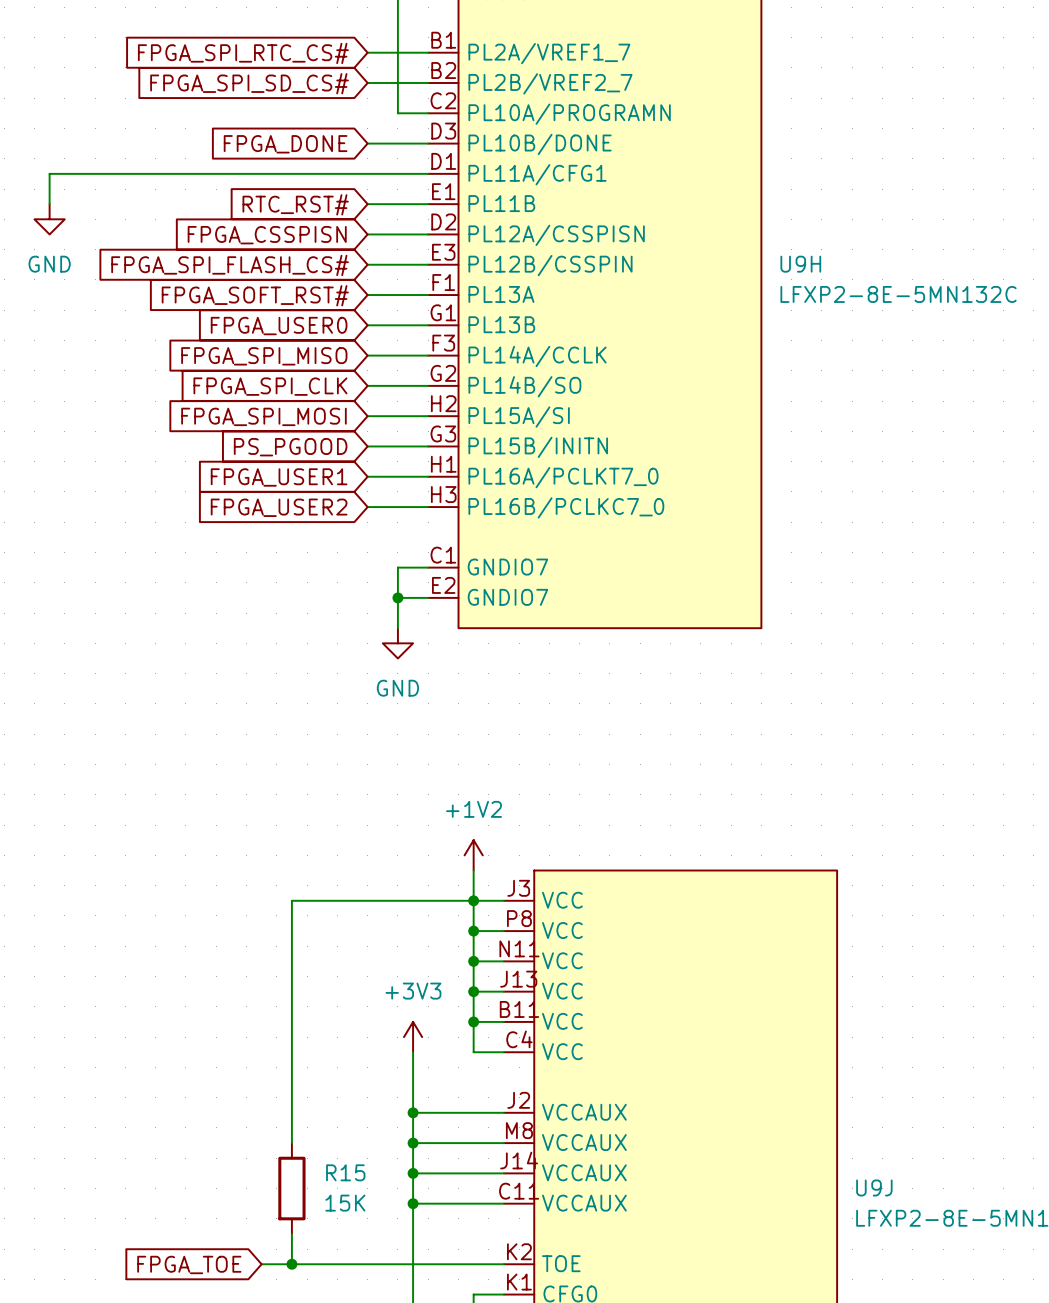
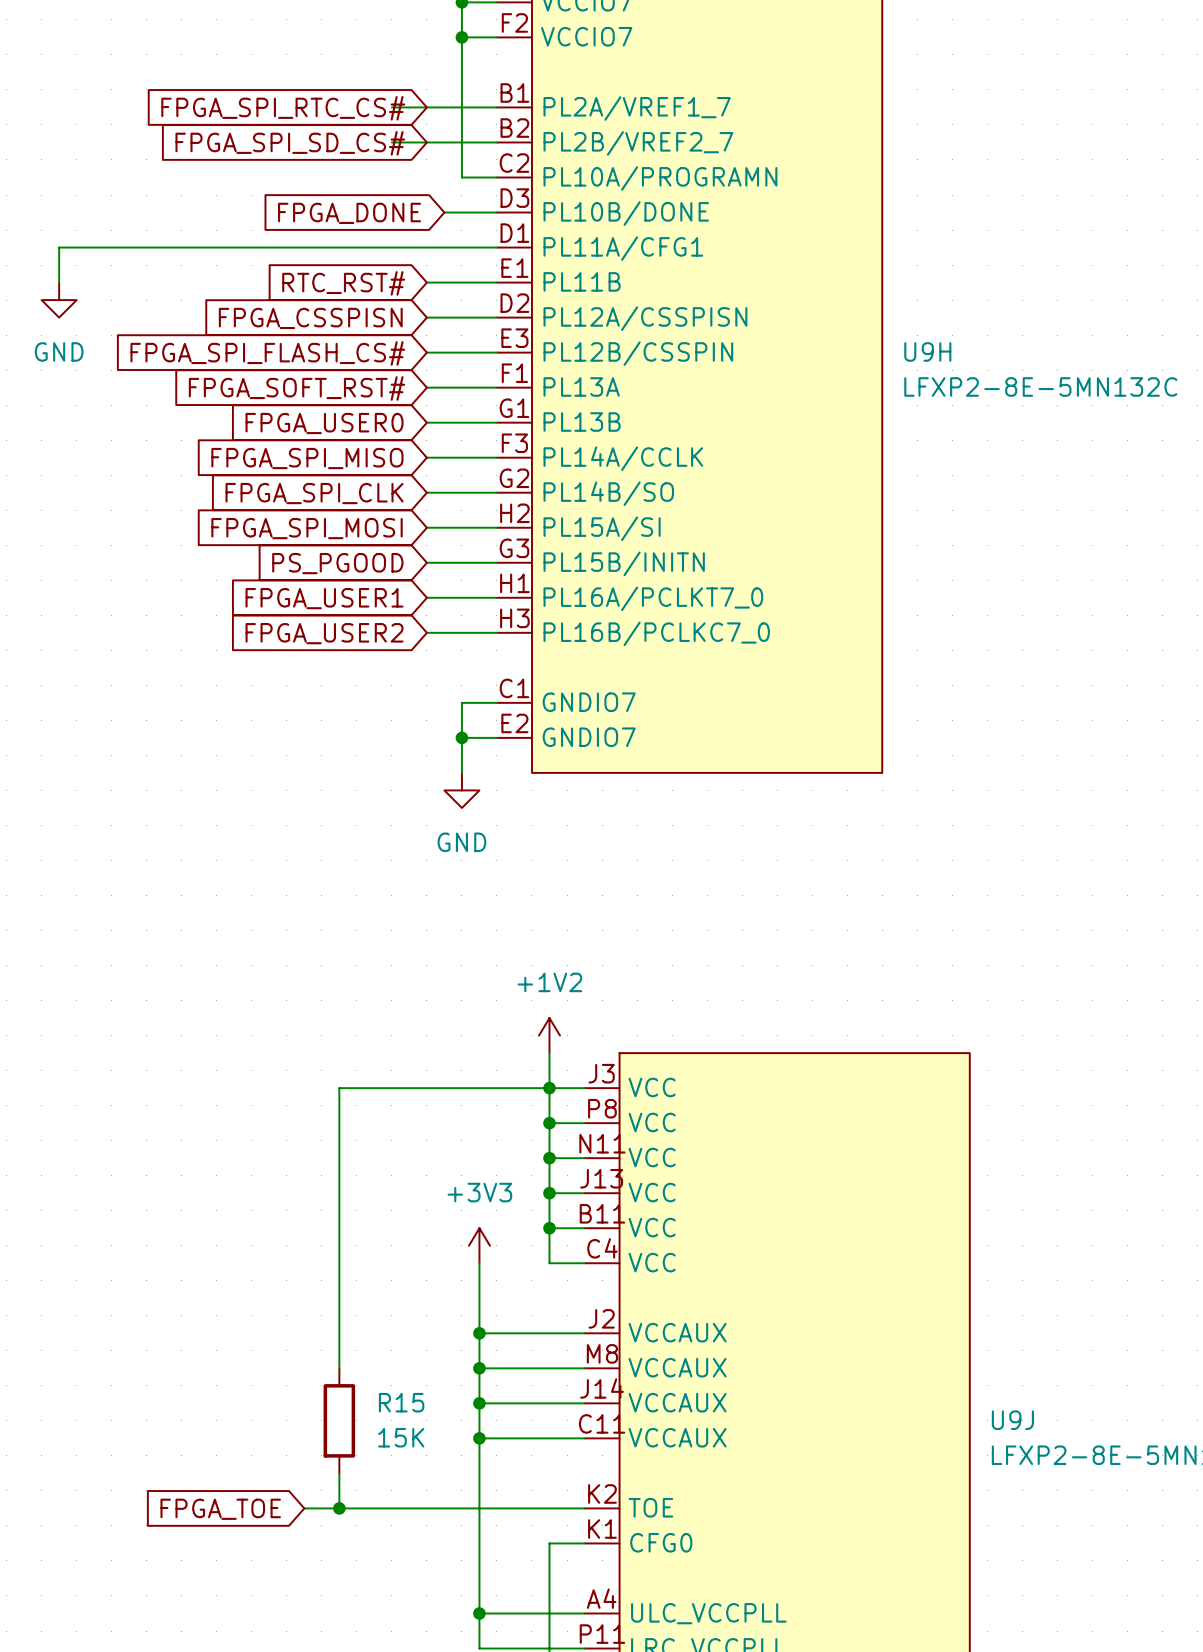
wire: none -> (391, 107) (426, 107)
wire: none -> (391, 142) (426, 142)
wire: (367, 143) (382, 143) -> none
global label position: FPGA_DONE (285, 144) -> FPGA_DONE (349, 213)

